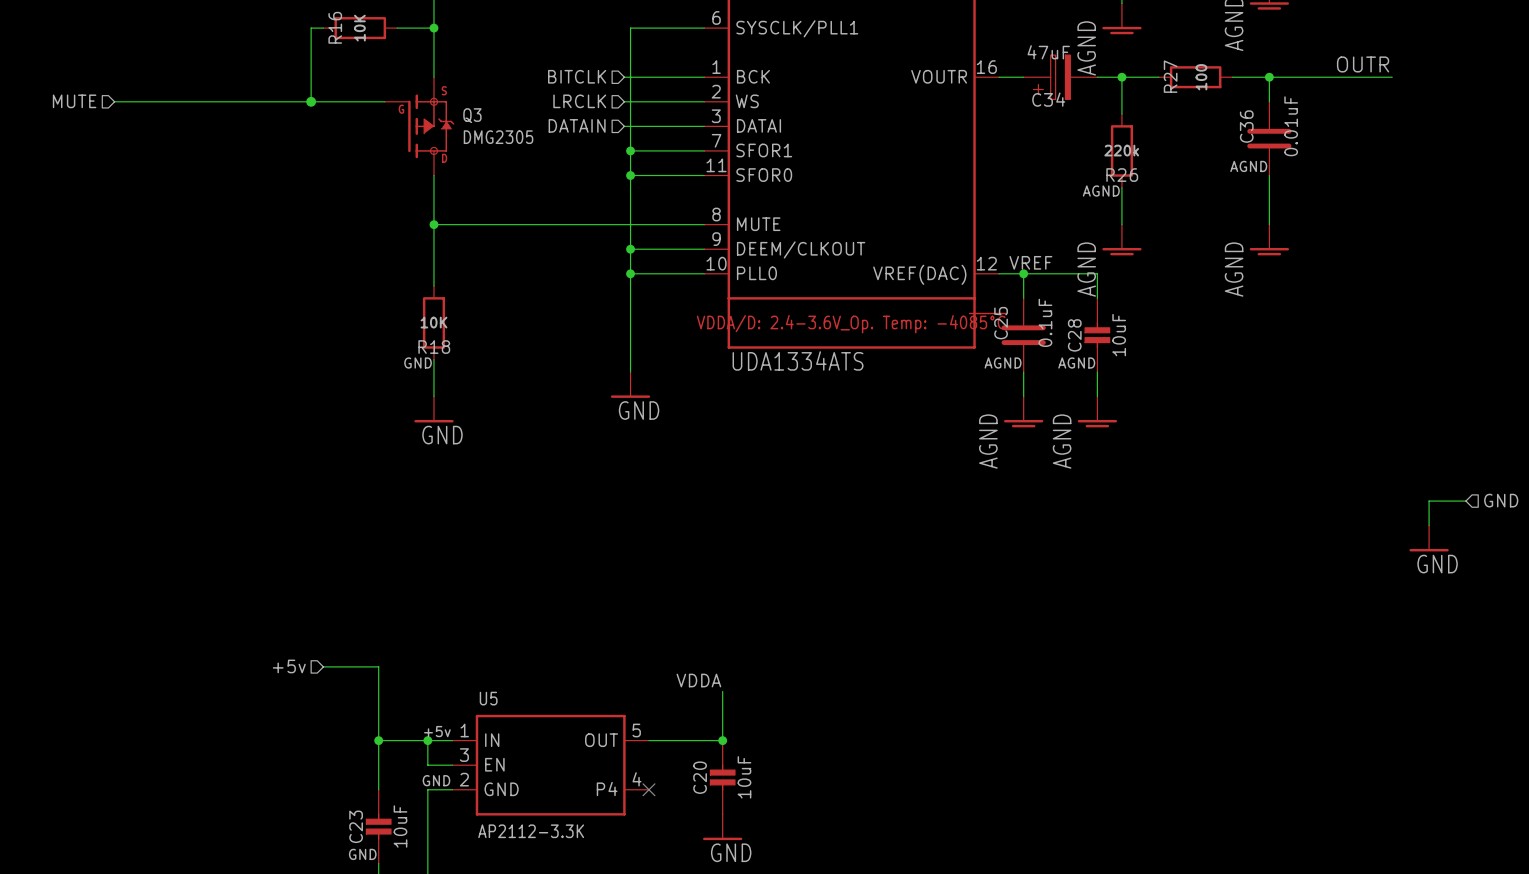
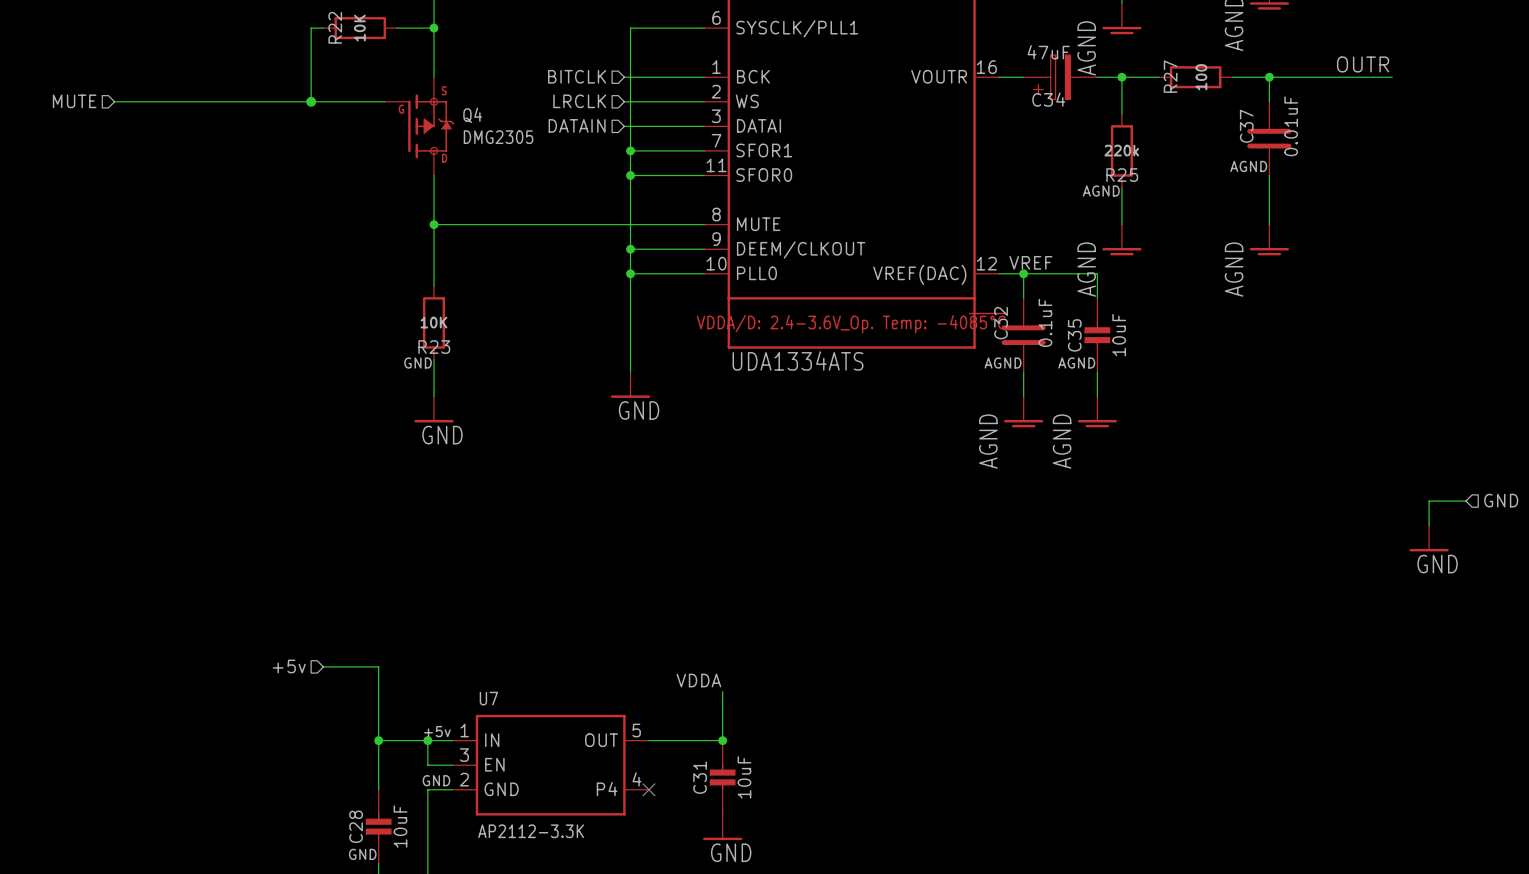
R16 name: R16 (335, 27) -> R22 (335, 27)
Q3 name: Q3 (472, 115) -> Q4 (472, 115)
C36 name: C36 (1246, 126) -> C37 (1246, 126)
R26 name: R26 (1122, 175) -> R25 (1122, 175)
C25 name: C25 (1001, 323) -> C32 (1001, 323)
C28 name: C28 (1074, 335) -> C35 (1074, 335)
R18 name: R18 (434, 347) -> R23 (434, 347)
U5 name: U5 (488, 698) -> U7 (488, 698)
C20 name: C20 (700, 777) -> C31 (700, 777)
C23 name: C23 (356, 826) -> C28 (356, 826)

